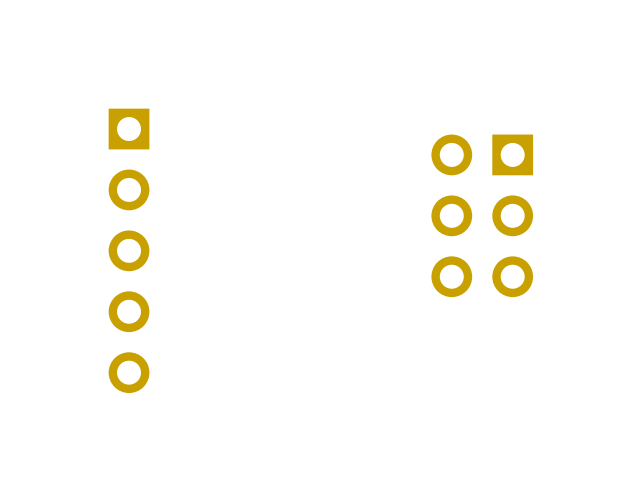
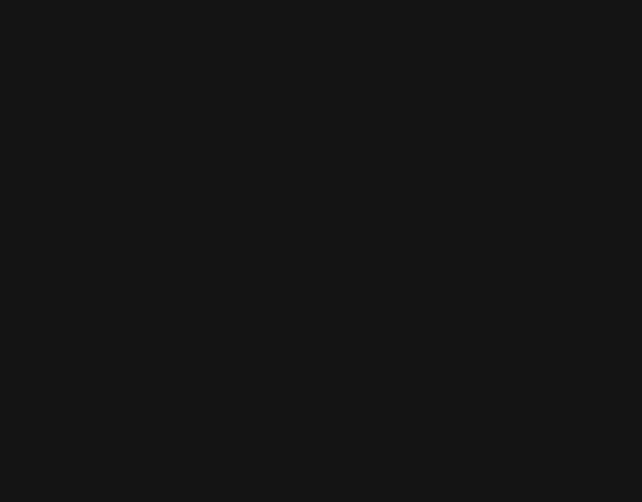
part: (482, 215) -> none
part: (129, 250) -> none

